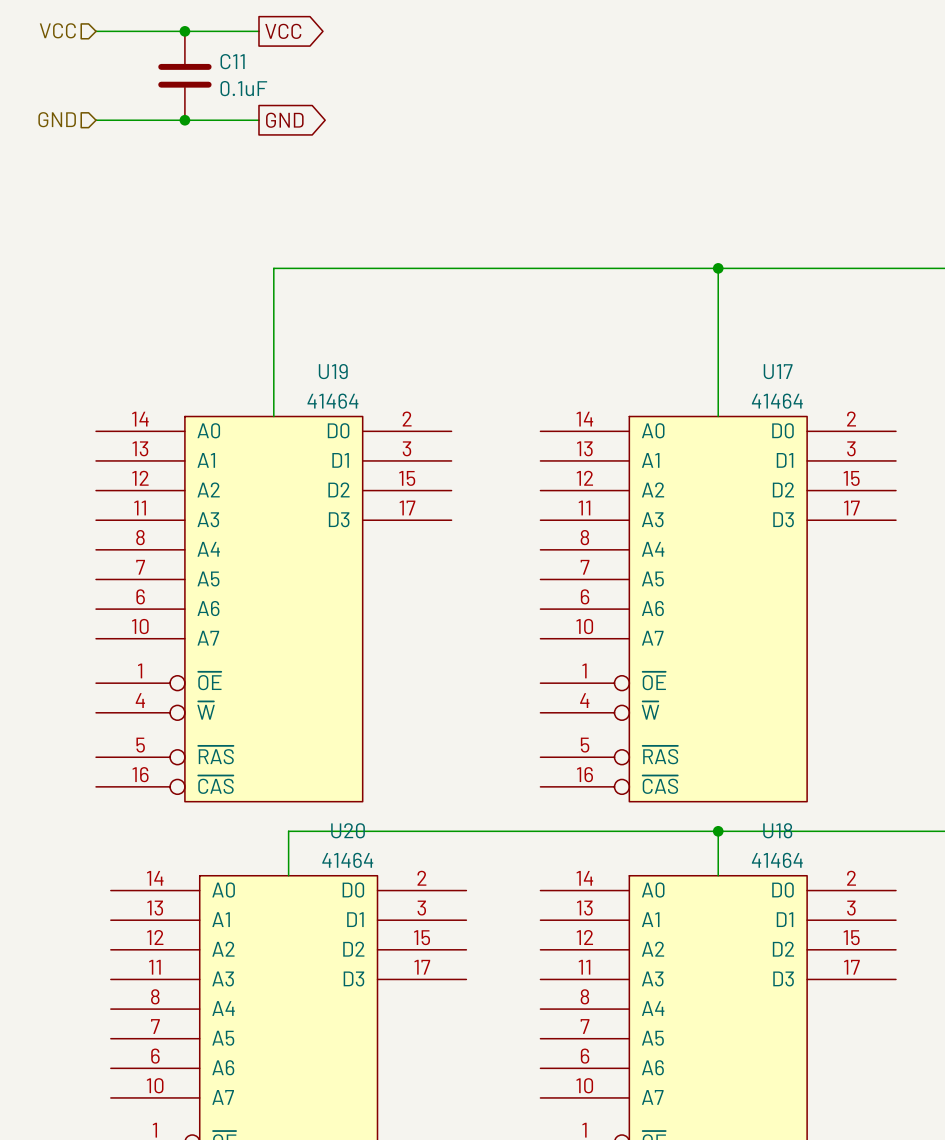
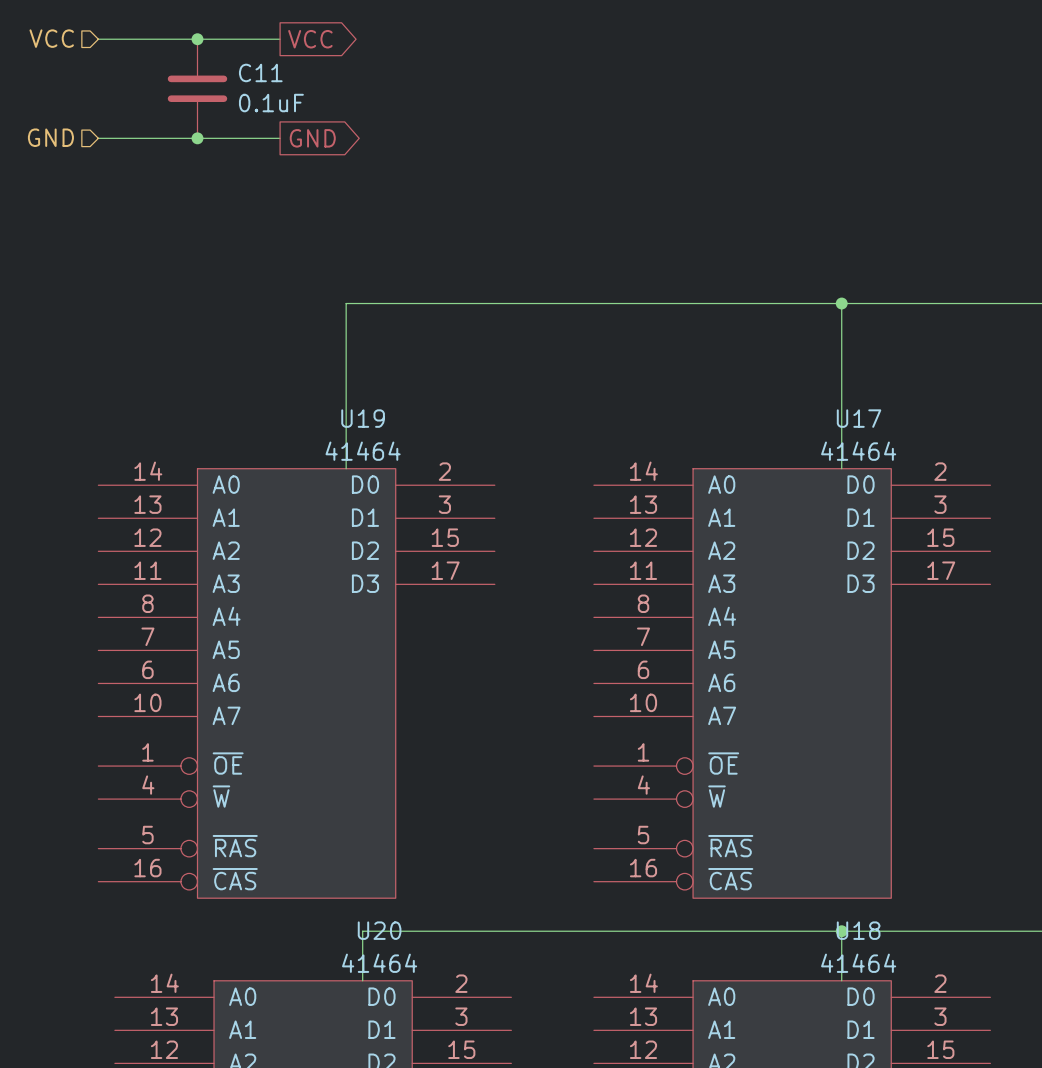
wire: (318, 268) (273, 268) (273, 416) -> (346, 303) (346, 468)
wire: (718, 268) (718, 416) -> (841, 303) (841, 468)
junction position: (718, 268) -> (841, 303)
wire: (333, 831) (288, 831) (288, 875) -> (362, 931) (362, 980)
wire: (718, 831) (718, 875) -> (841, 931) (841, 980)
junction position: (718, 831) -> (841, 931)

